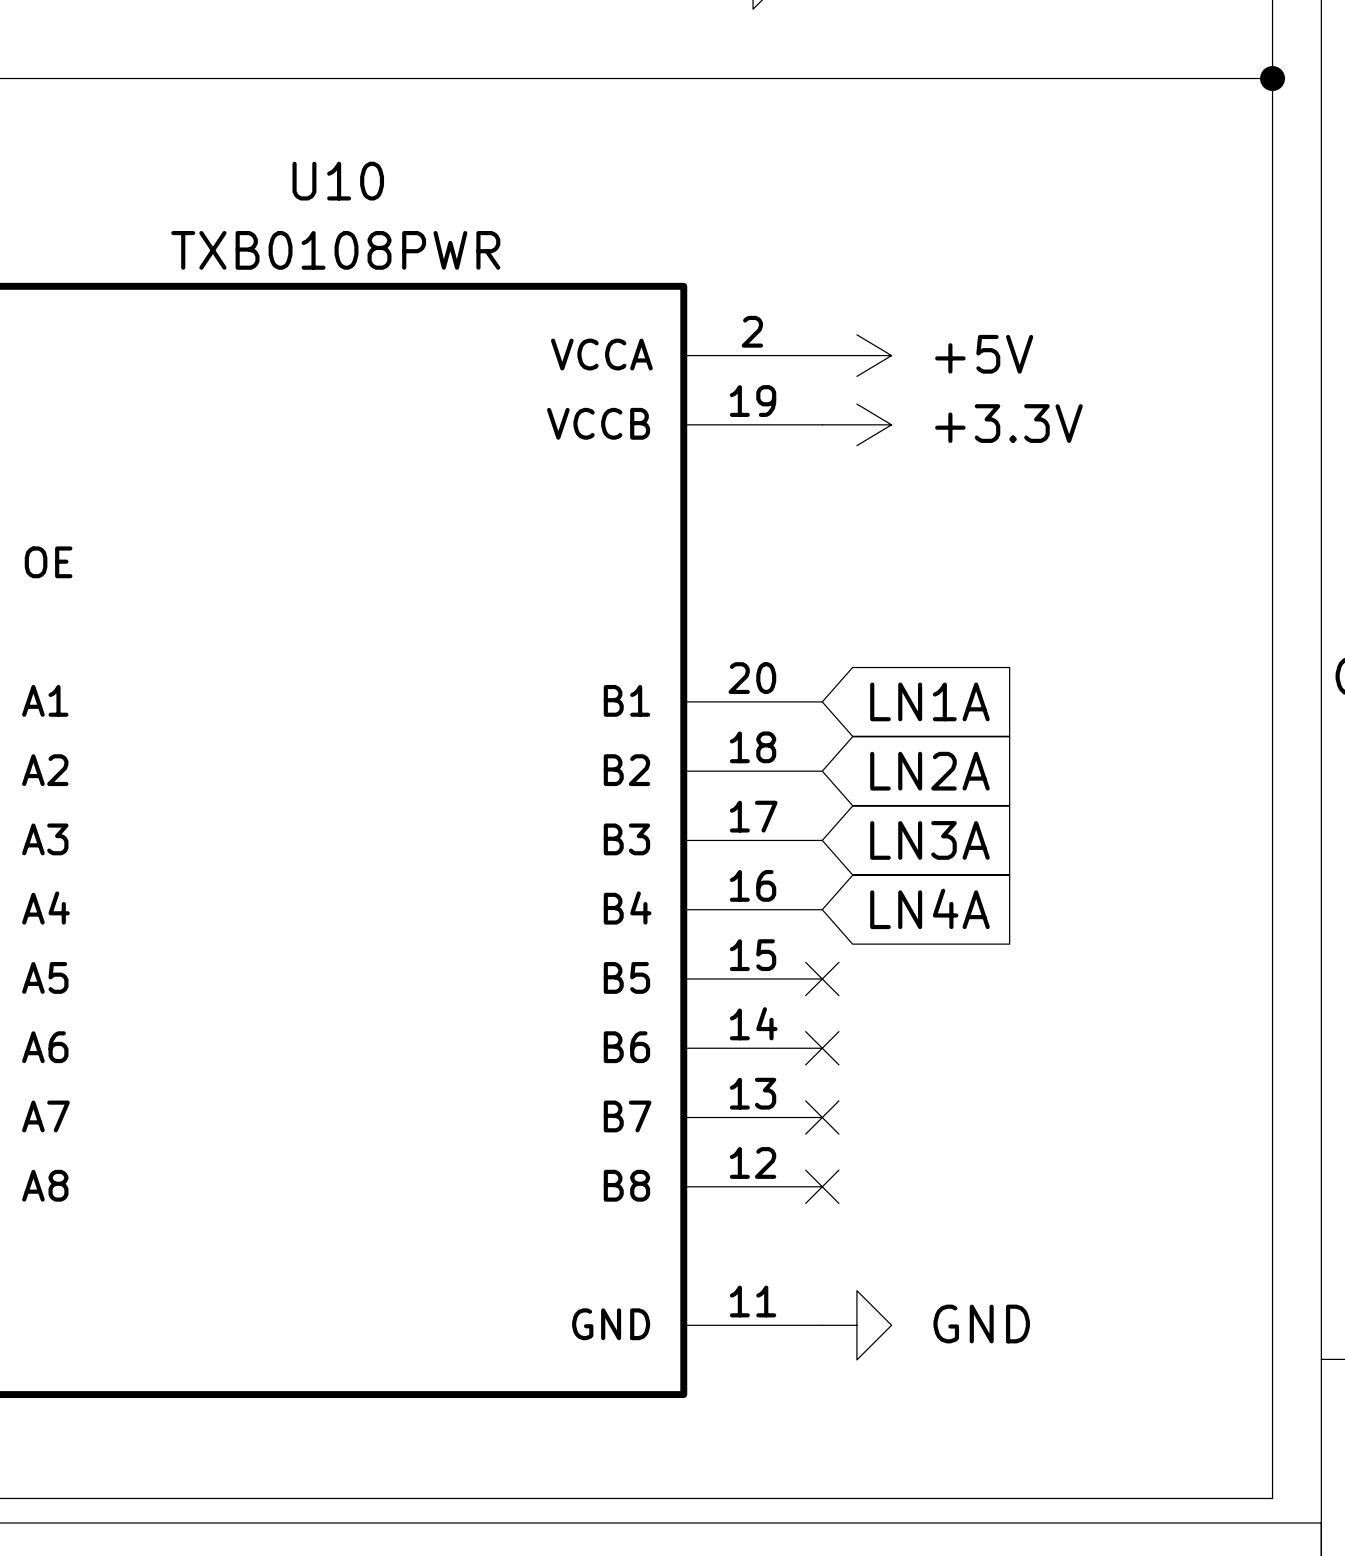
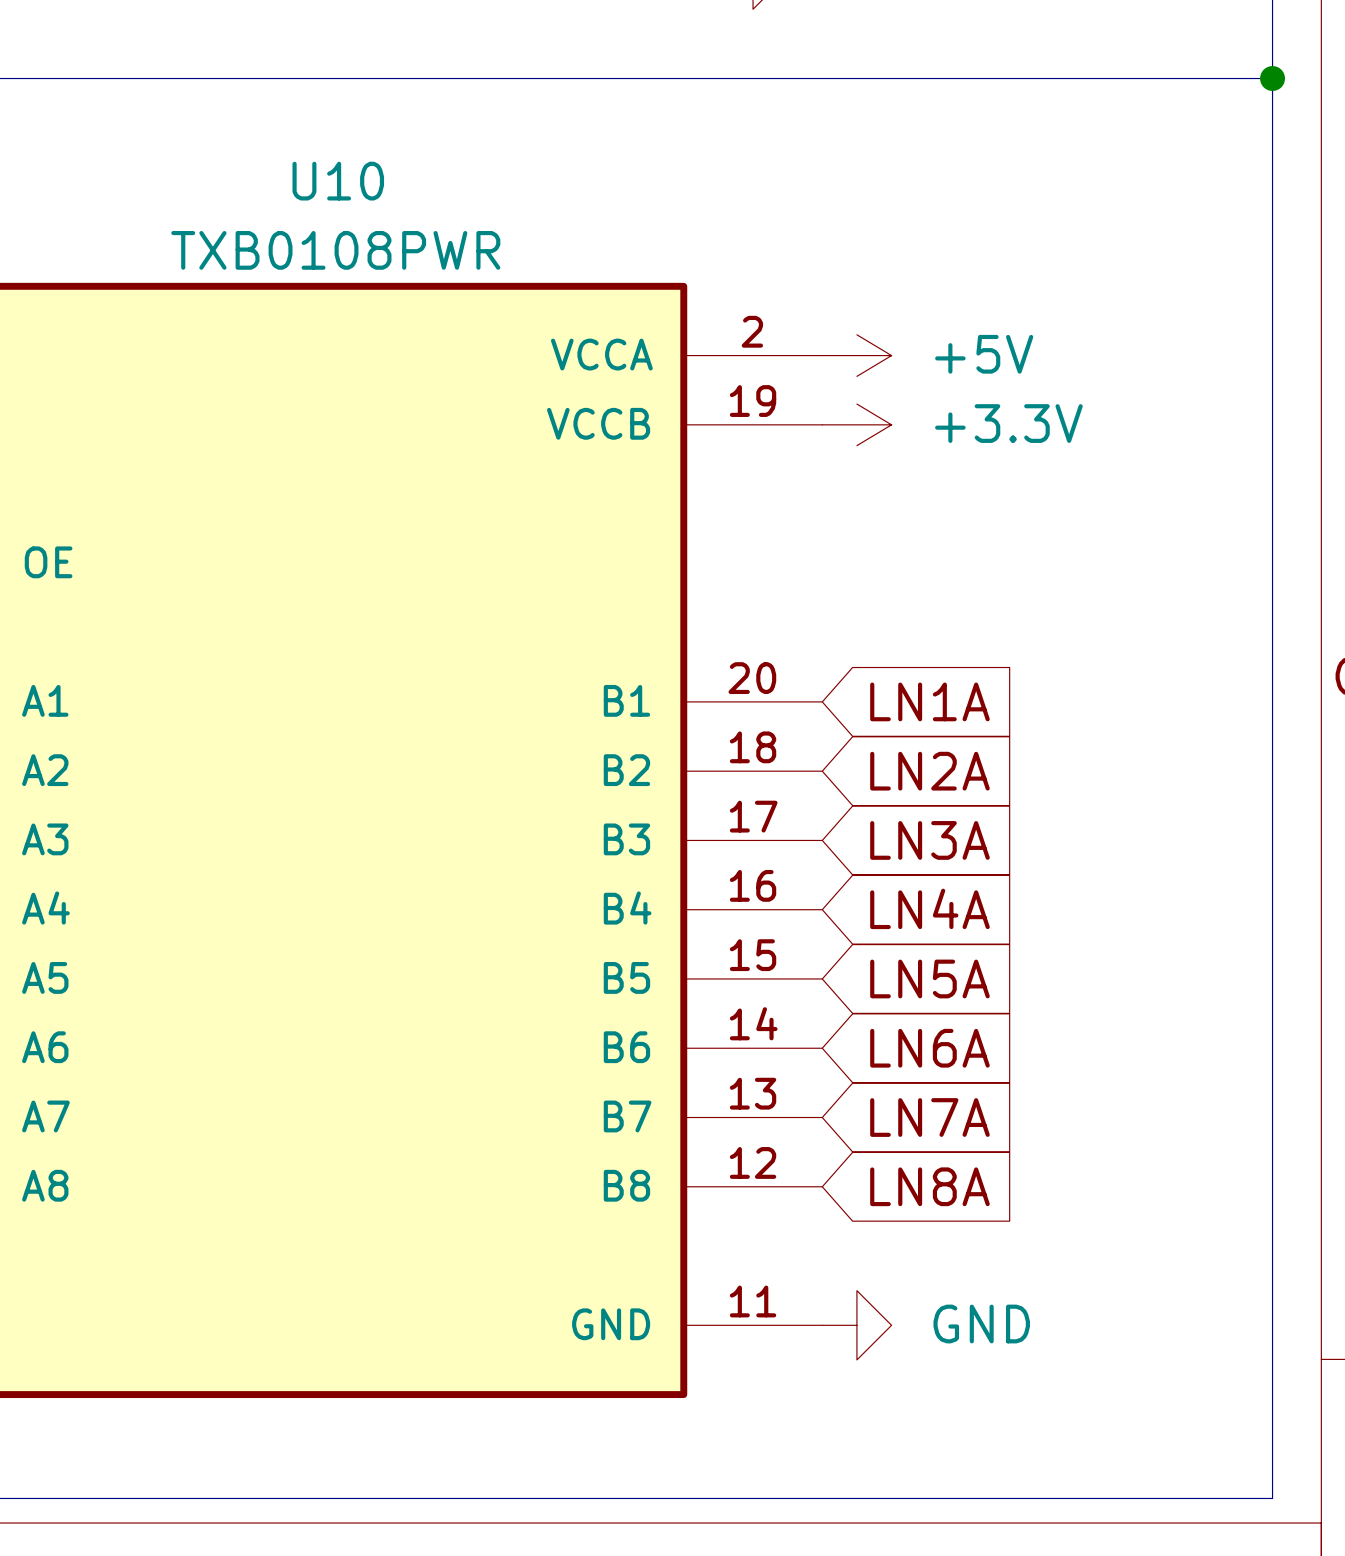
no-connect mark: (822, 978) -> none
global label: none -> LN5A (929, 978)
no-connect mark: (822, 1048) -> none
global label: none -> LN6A (929, 1048)
no-connect mark: (822, 1117) -> none
global label: none -> LN7A (929, 1117)
no-connect mark: (822, 1186) -> none
global label: none -> LN8A (929, 1186)

